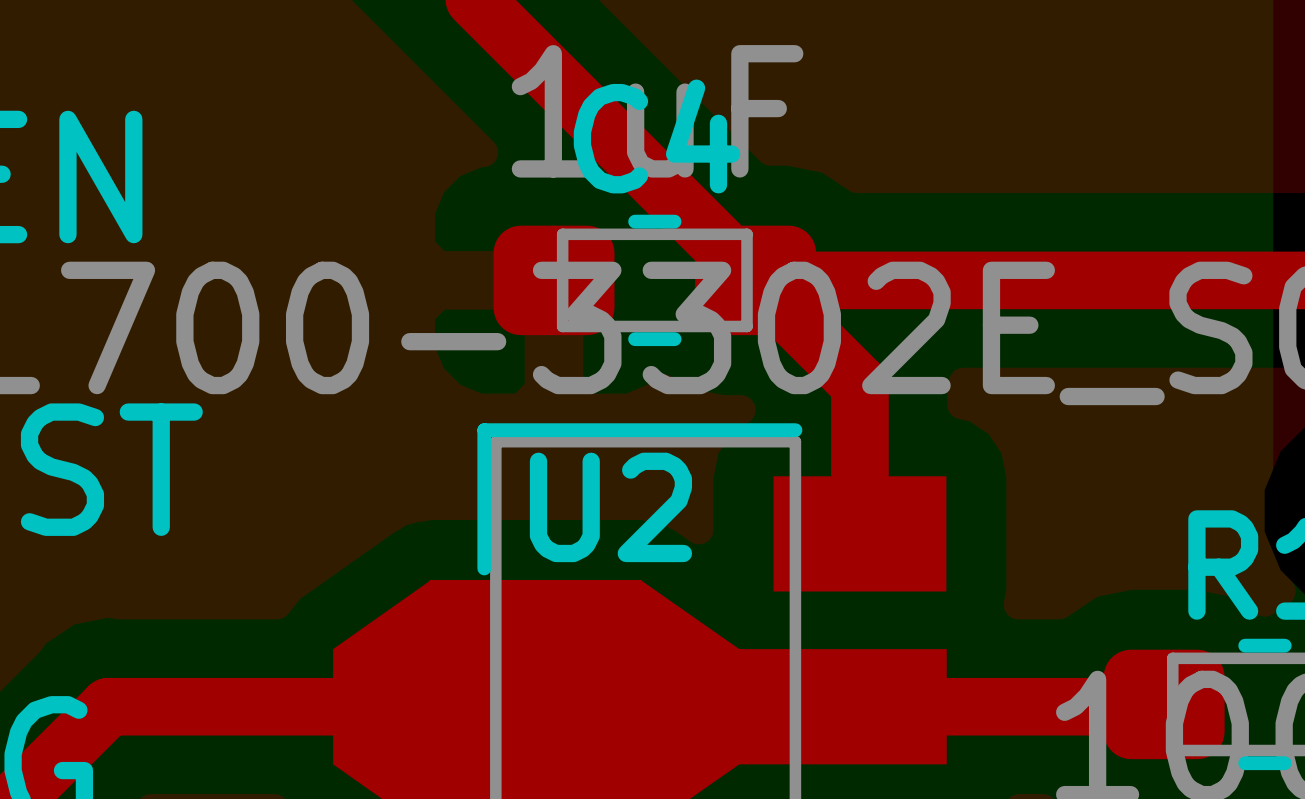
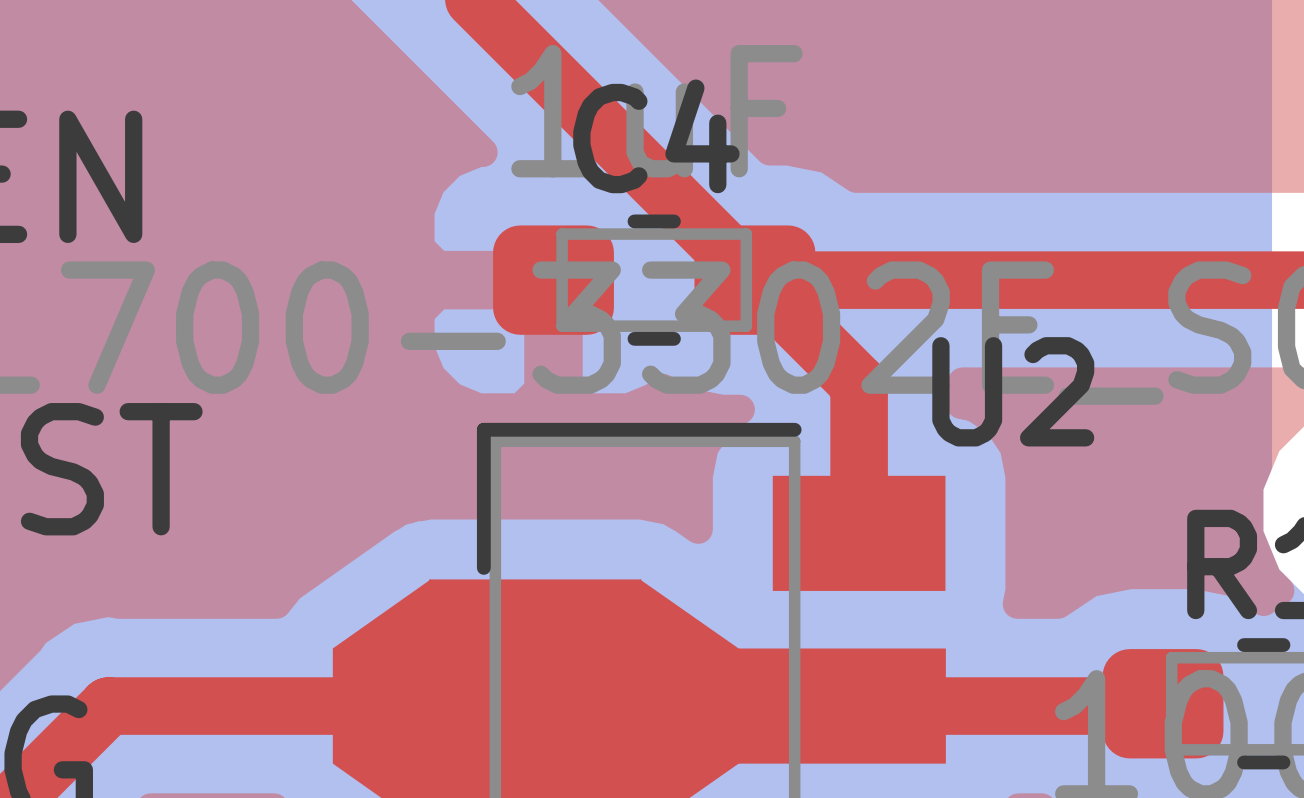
U2 name position: U2 (610, 507) -> U2 (1013, 391)

